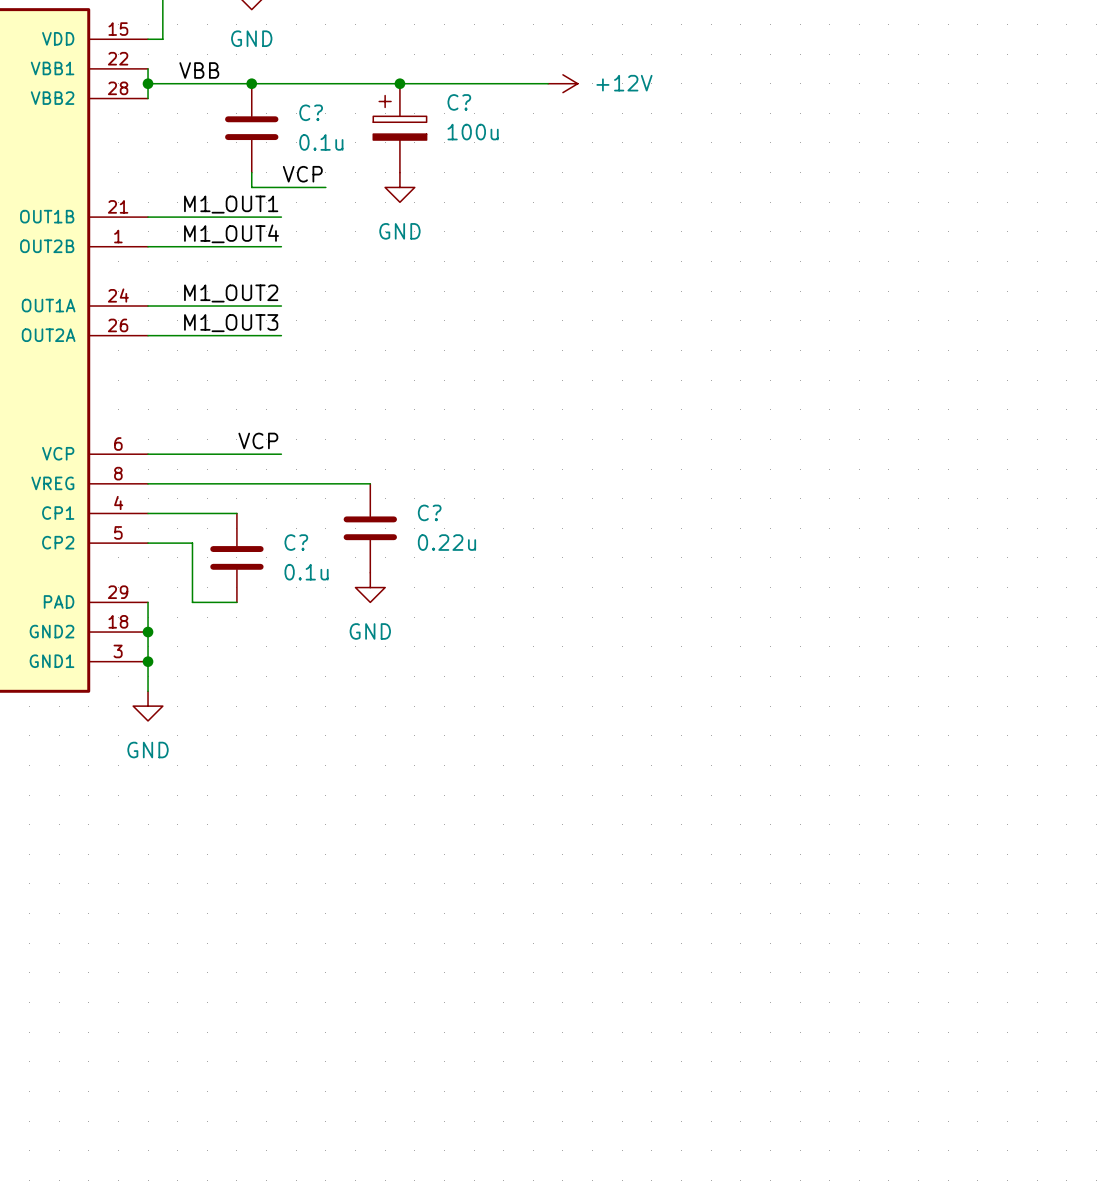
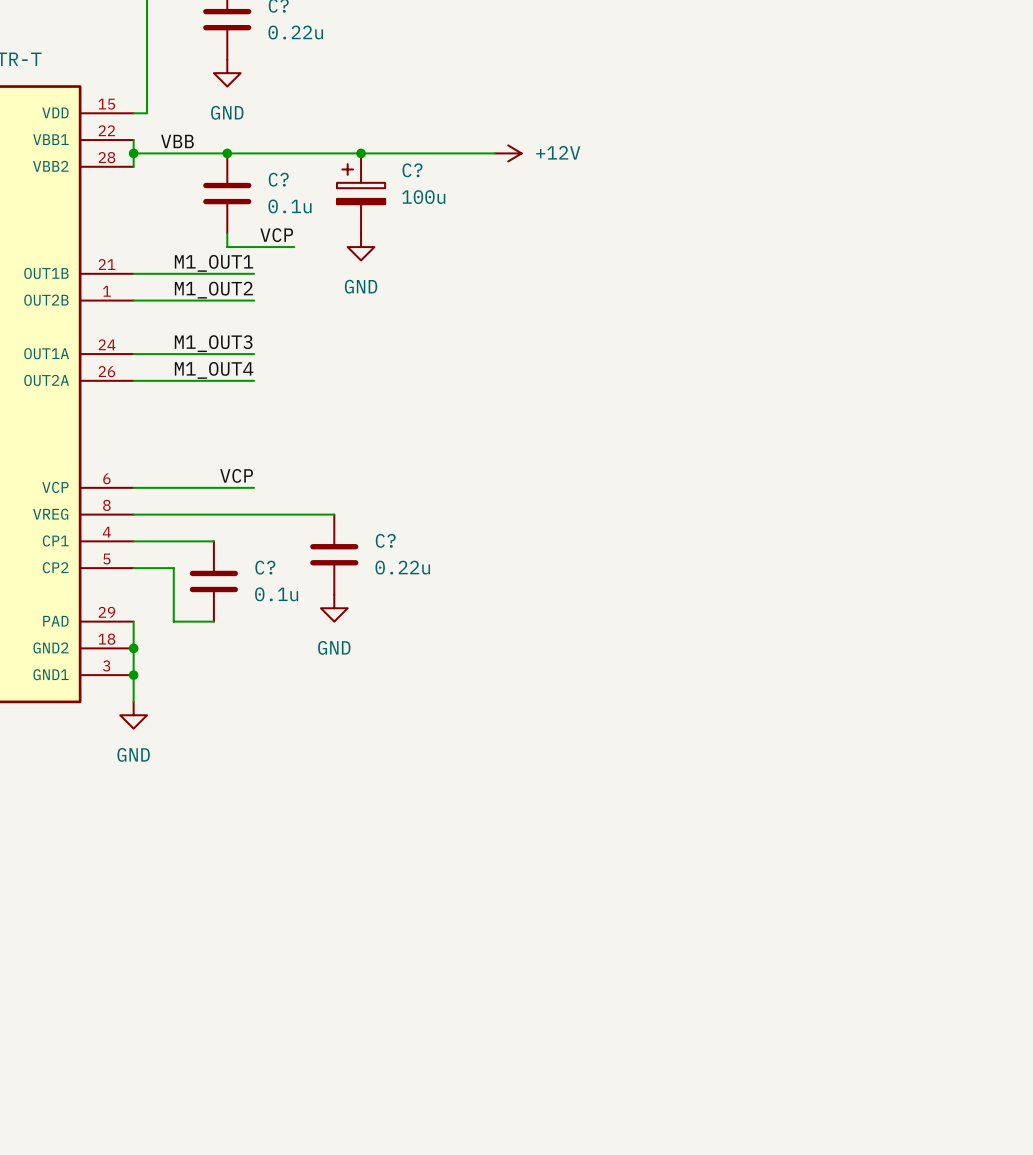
label: M1_OUT4 (231, 233) -> M1_OUT2 (213, 290)
label: M1_OUT2 (231, 293) -> M1_OUT3 (213, 343)
label: M1_OUT3 (231, 323) -> M1_OUT4 (214, 370)

